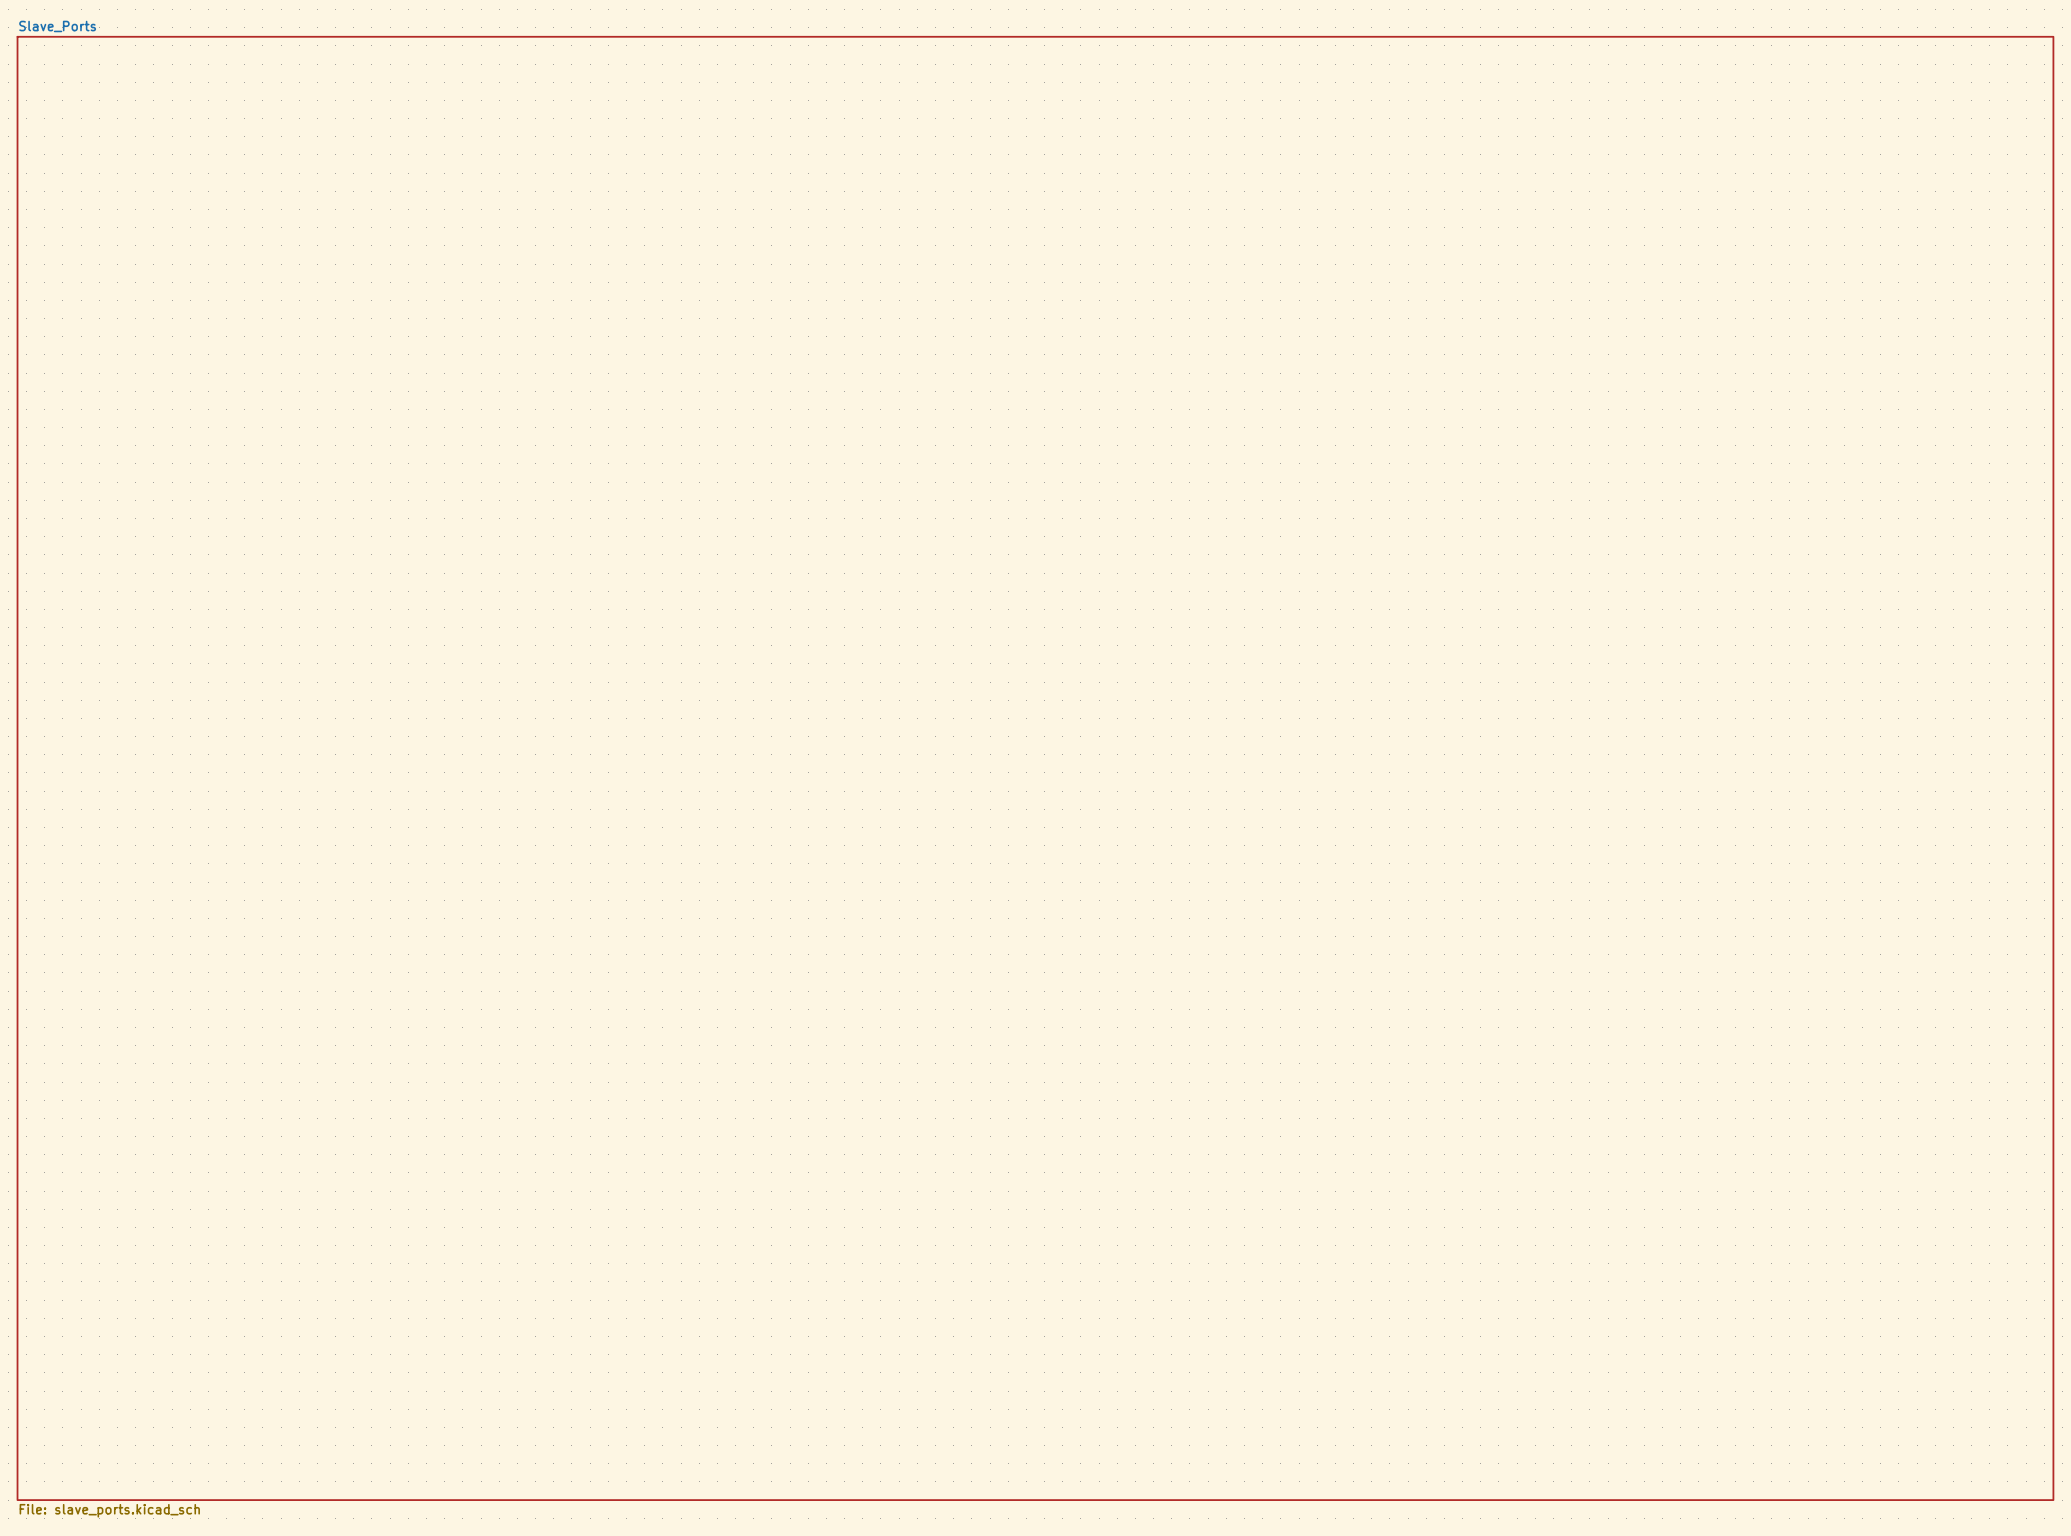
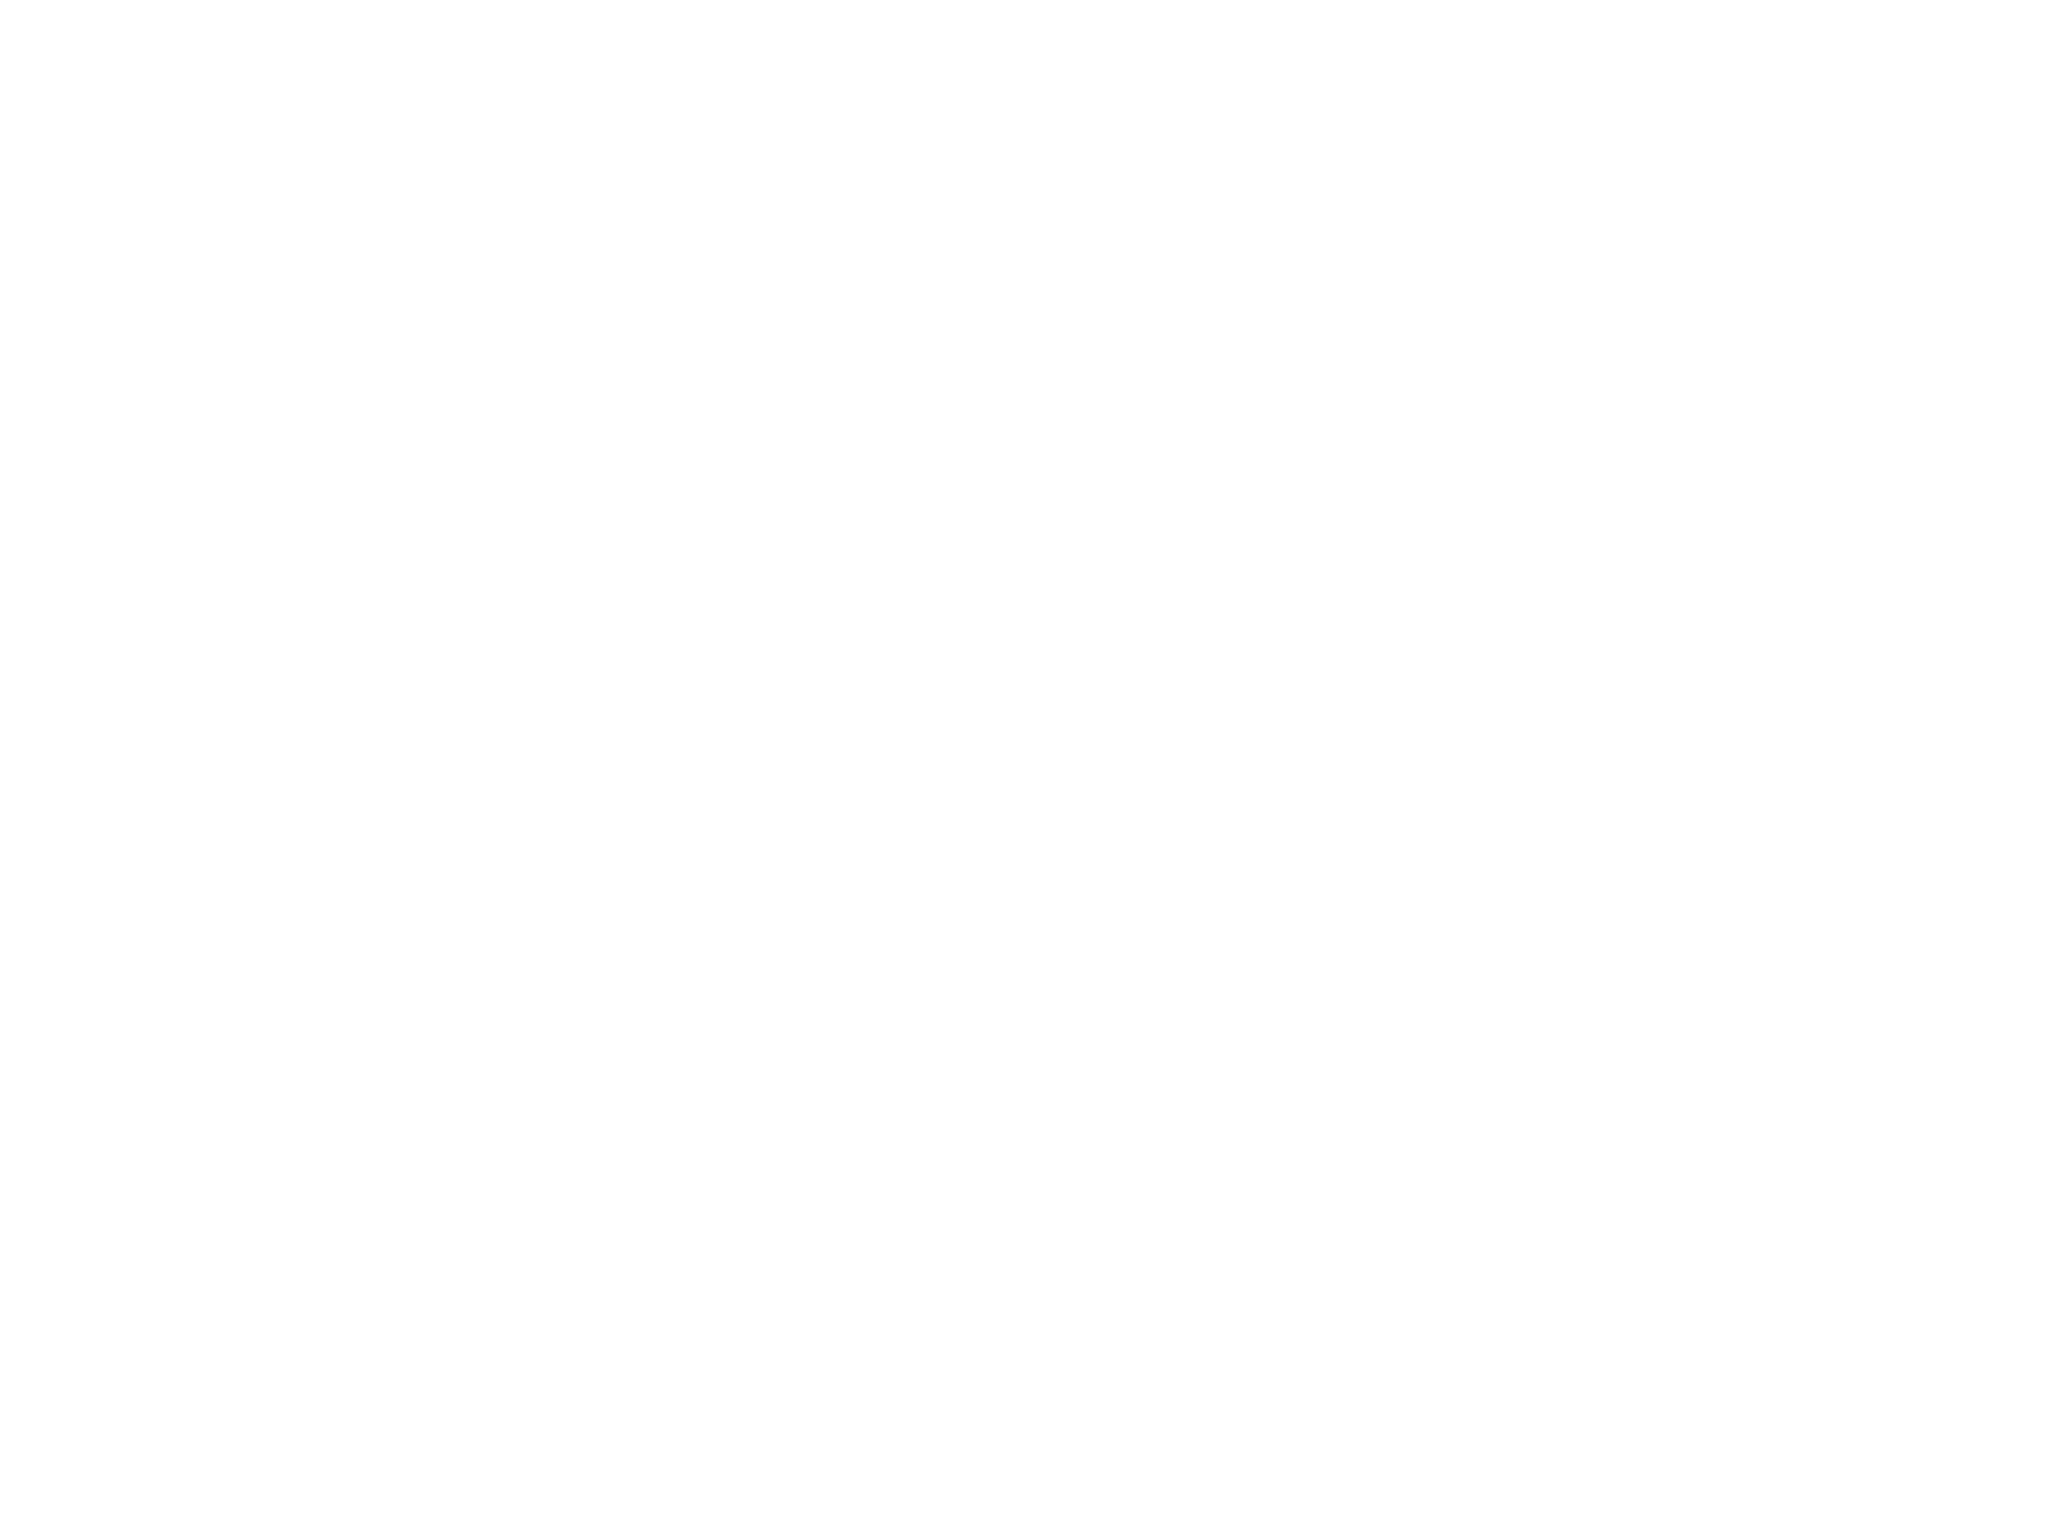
sheet Slave_Ports: File: slave_ports.kicad_sch (1035, 768) -> none

